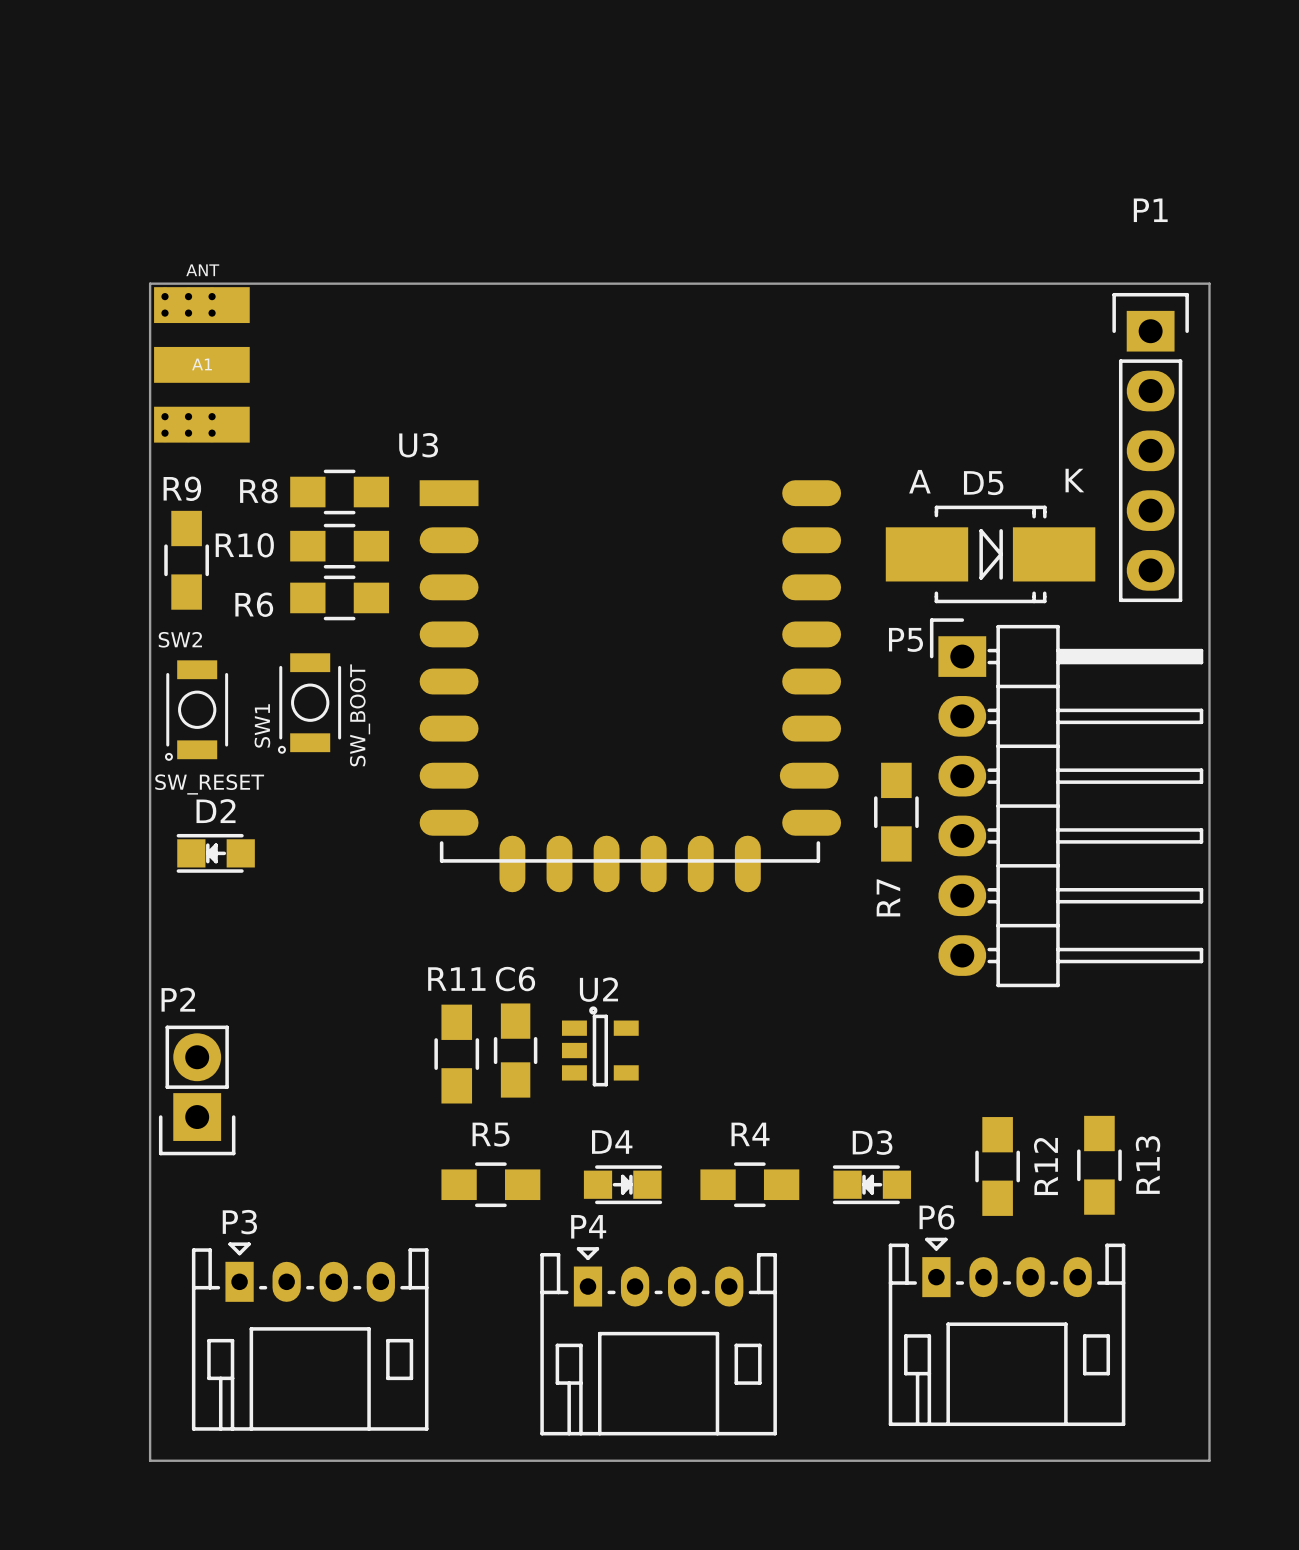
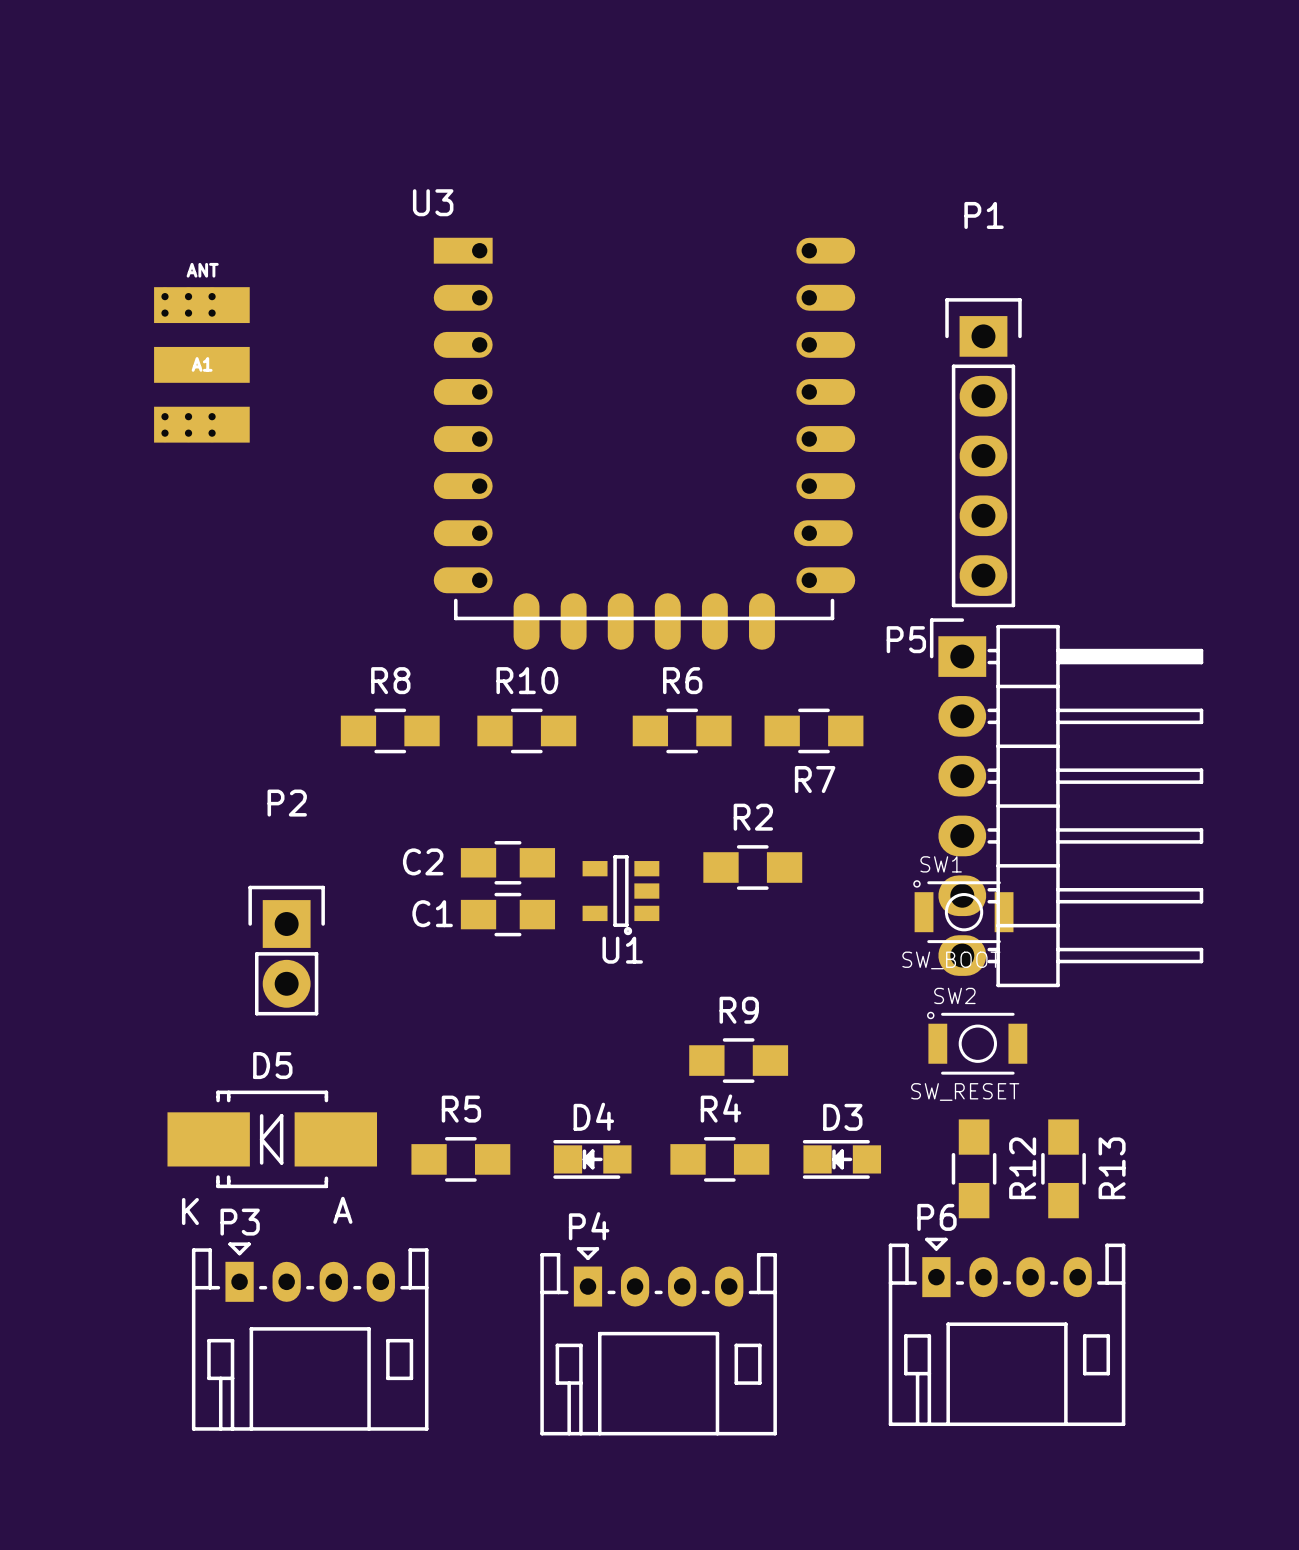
board edge: (150, 283) (150, 1460) (1209, 1460) (1209, 283) (150, 283) -> none
P1 position: (1150, 447) -> (983, 452)
U3 footprint: [419, 480, 842, 893] -> [433, 237, 856, 650]
R8 name position: R8 (258, 491) -> R8 (390, 680)
R8 position: (339, 492) -> (390, 730)
R10 name position: R10 (244, 545) -> R10 (527, 680)
R10 position: (339, 546) -> (526, 730)
D5 rotation: 0° (990, 554) -> 180° (272, 1139)
D5 position: (990, 554) -> (272, 1139)
R9 rotation: 0° (186, 560) -> 90° clockwise (738, 1060)
R9 position: (186, 560) -> (738, 1060)
R6 position: (339, 597) -> (682, 730)
R6 name position: R6 (254, 604) -> R6 (682, 680)
SW1 rotation: 0° (310, 703) -> 90° clockwise (963, 912)
SW1 position: (310, 703) -> (963, 912)
SW2 rotation: 0° (197, 710) -> 90° clockwise (977, 1043)
SW2 position: (197, 710) -> (977, 1043)
R7 rotation: 0° (896, 812) -> 90° clockwise (813, 730)
R7 position: (896, 812) -> (813, 730)
D2: (215, 853) -> none
C2: none -> (507, 862)
R2: none -> (752, 867)
U1: none -> (620, 895)
C1: none -> (507, 914)
P2 name position: P2 (178, 999) -> P2 (287, 803)
U2: (600, 1046) -> none
C6: (515, 1050) -> none
R11: (456, 1054) -> none
P2 rotation: 0° (197, 1090) -> 180° (286, 950)
P2 position: (197, 1090) -> (286, 950)
R13 position: (1099, 1165) -> (1063, 1168)
R12 position: (997, 1166) -> (974, 1168)
R5 position: (490, 1184) -> (460, 1159)
D4 rotation: 0° (623, 1184) -> 180° (592, 1159)
R4 position: (749, 1184) -> (719, 1159)
D3 position: (871, 1184) -> (841, 1159)

